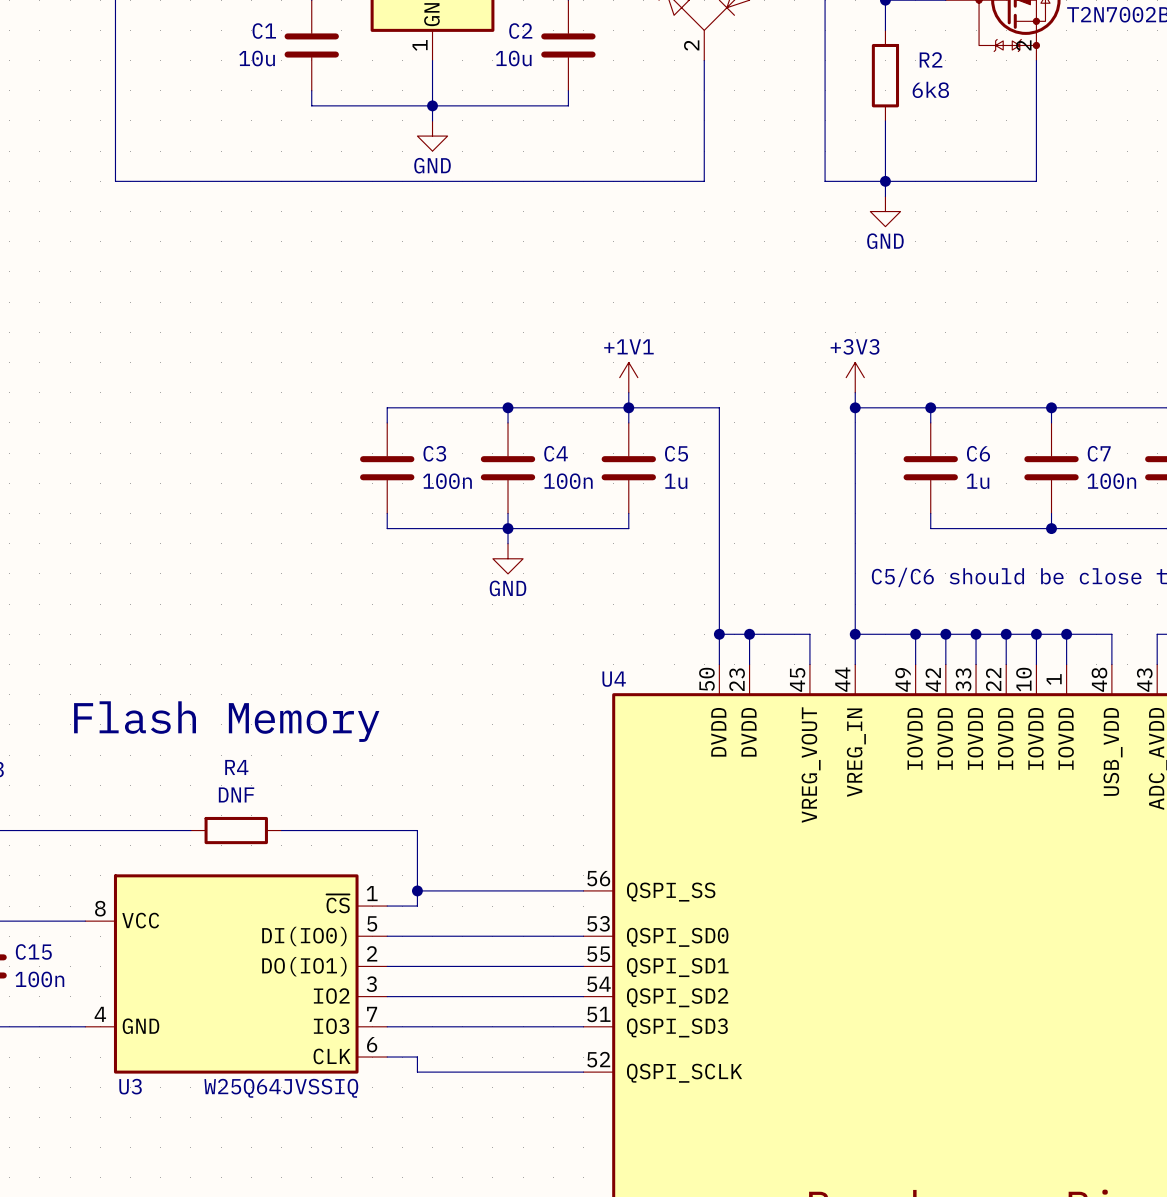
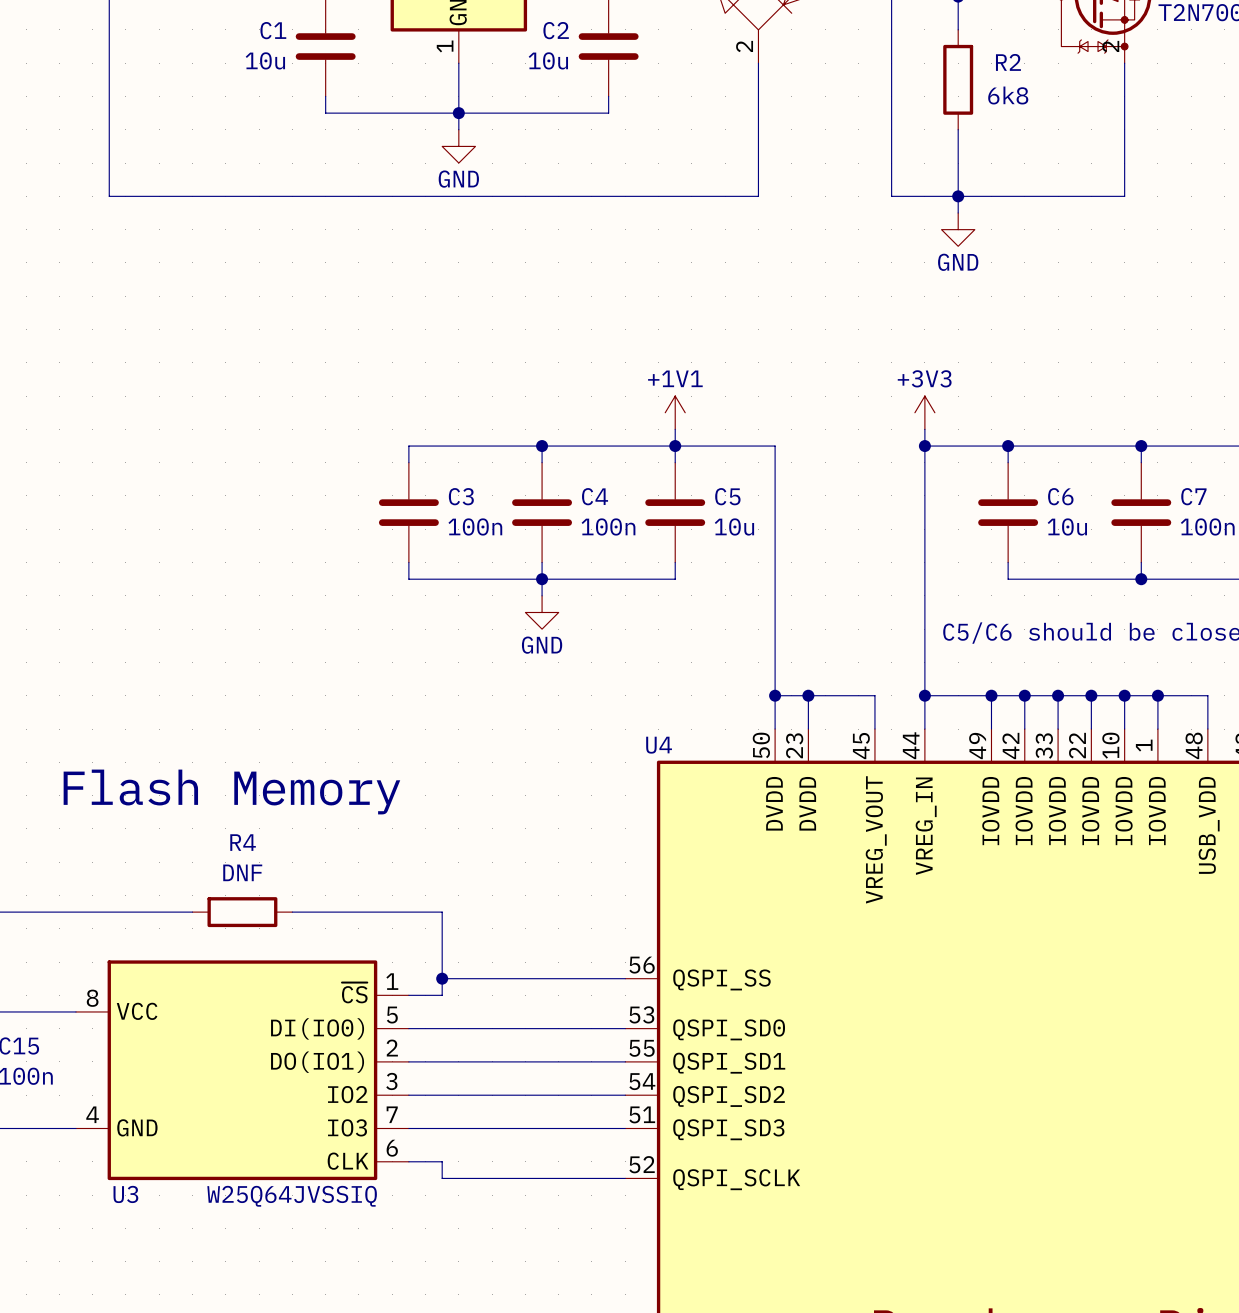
C5 value: 1u (676, 481) -> 10u (734, 526)
C6 value: 1u (977, 481) -> 10u (1067, 526)

